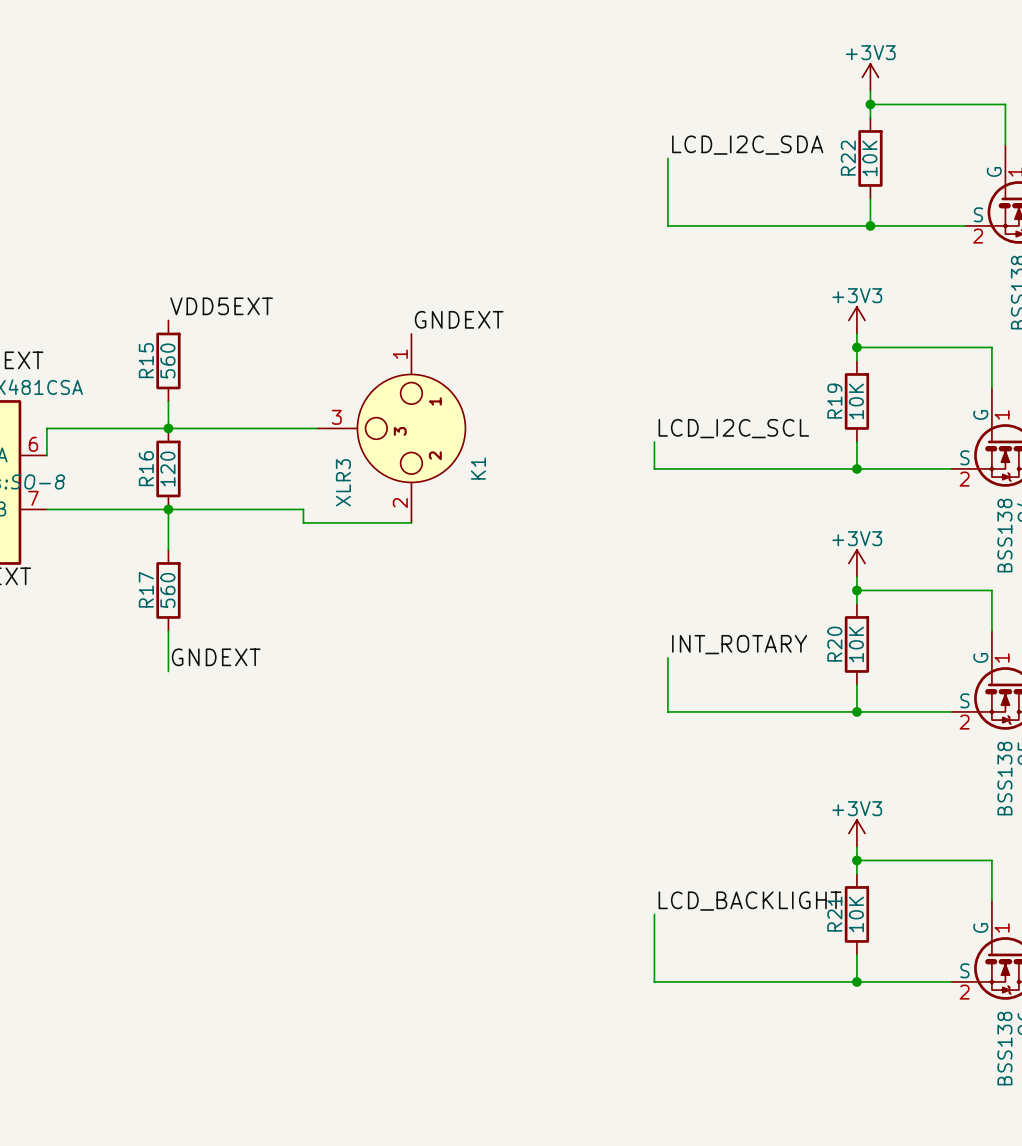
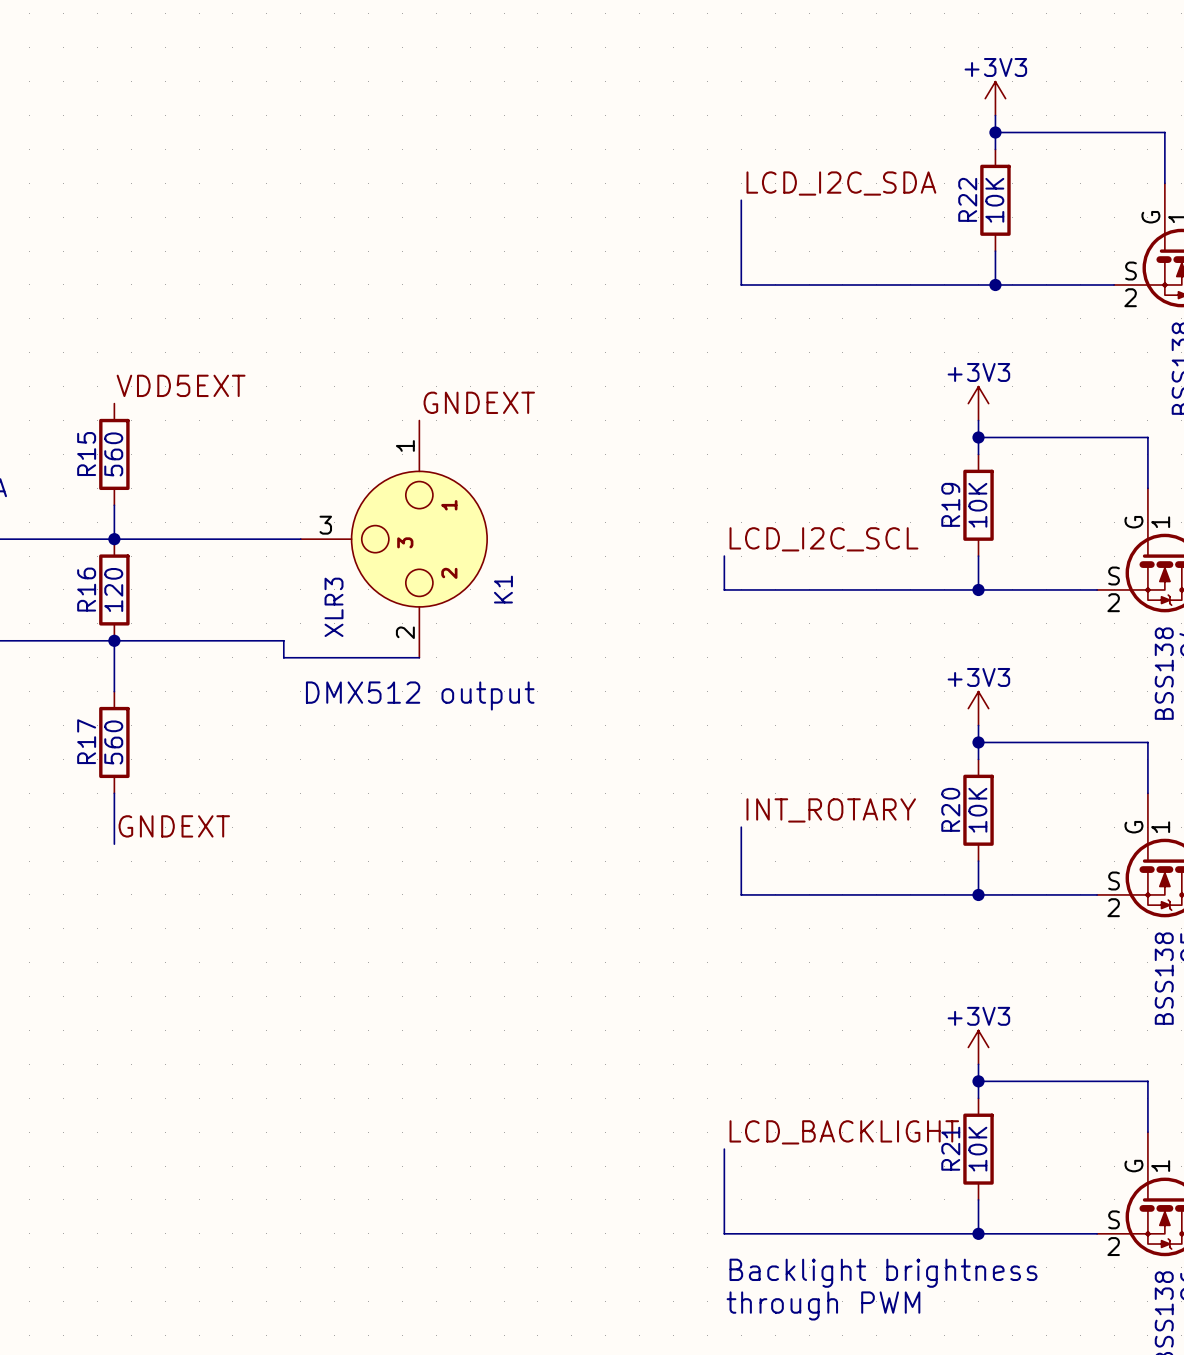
text: none -> DMX512 output (420, 695)
text: none -> Backlight brightness (883, 1273)
text: none -> through PWM (823, 1305)

